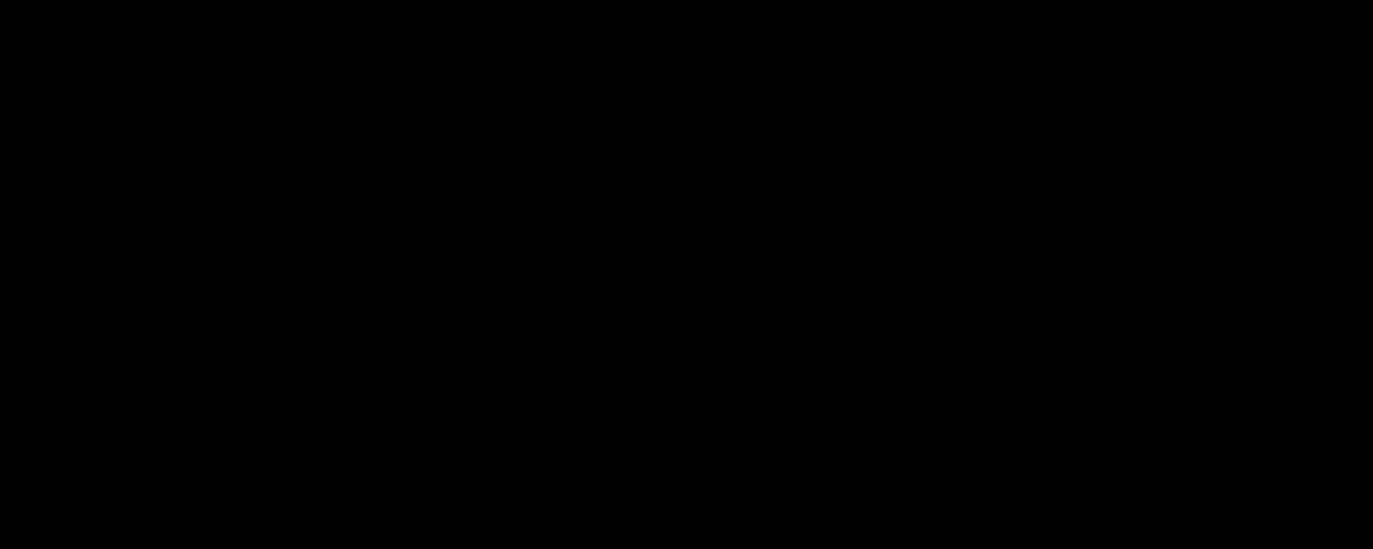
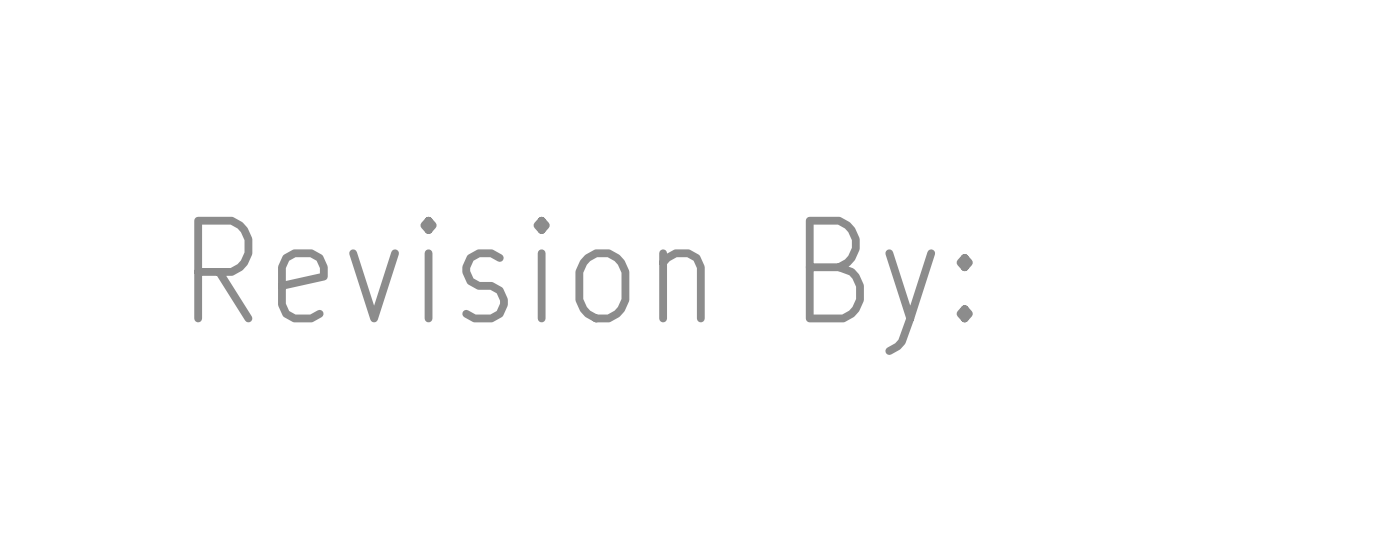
drawing: none -> [194, 216, 973, 355]

